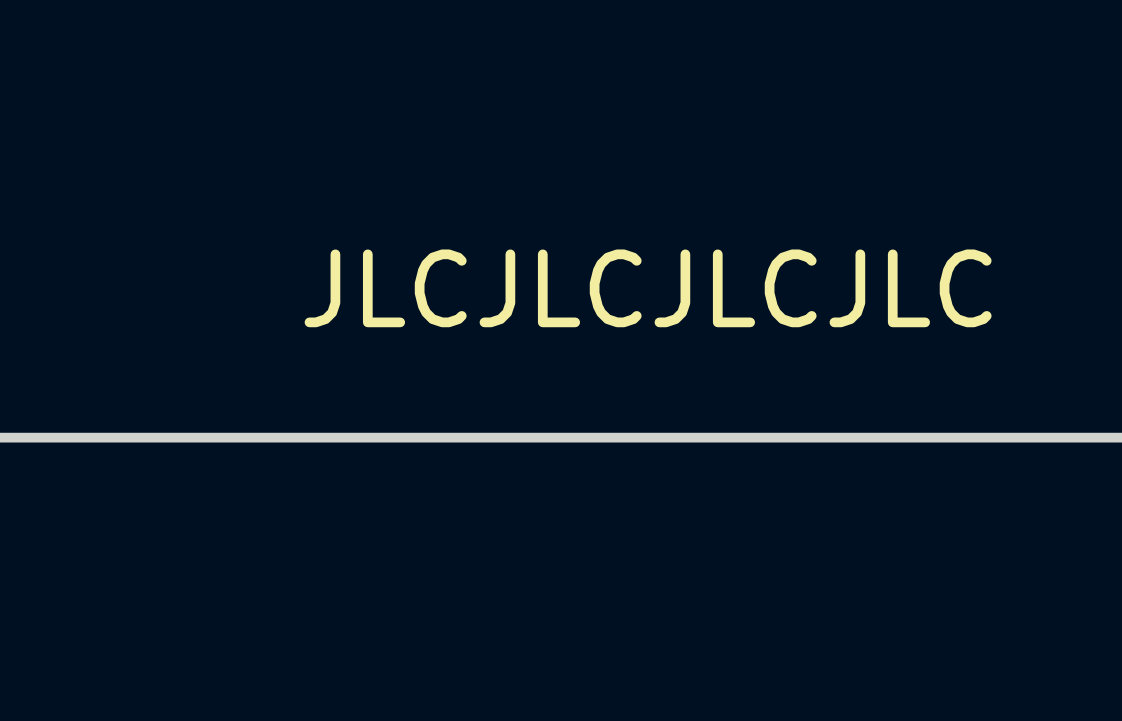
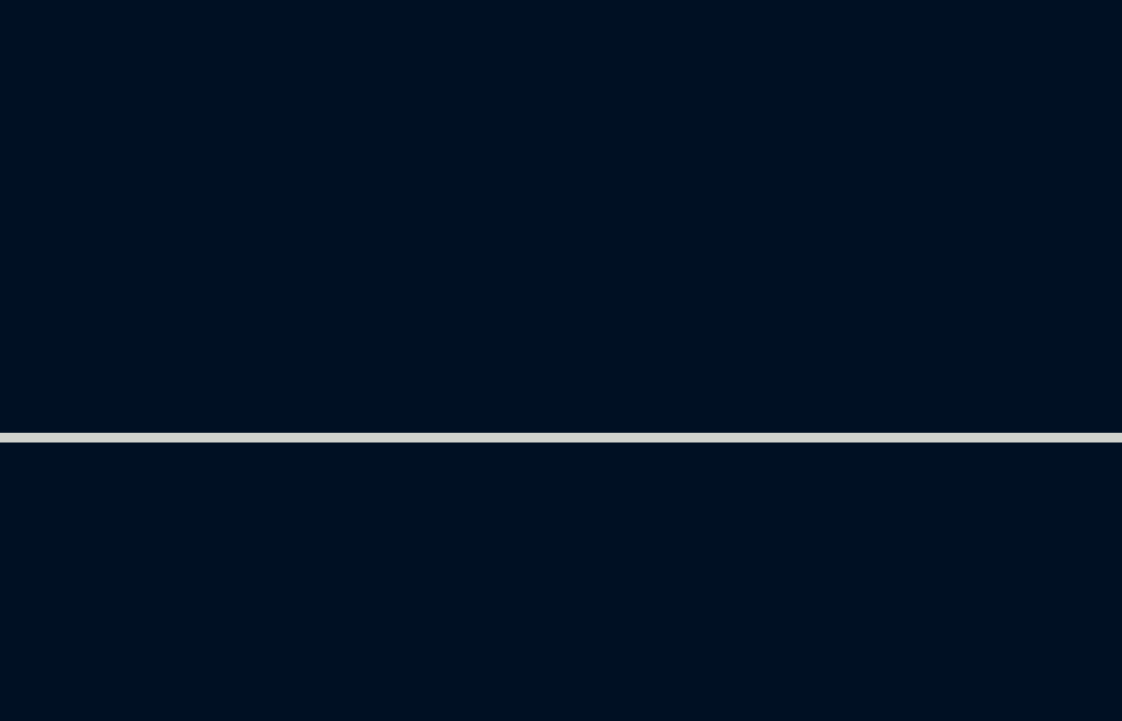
text: JLCJLCJLCJLC (648, 288) -> none

